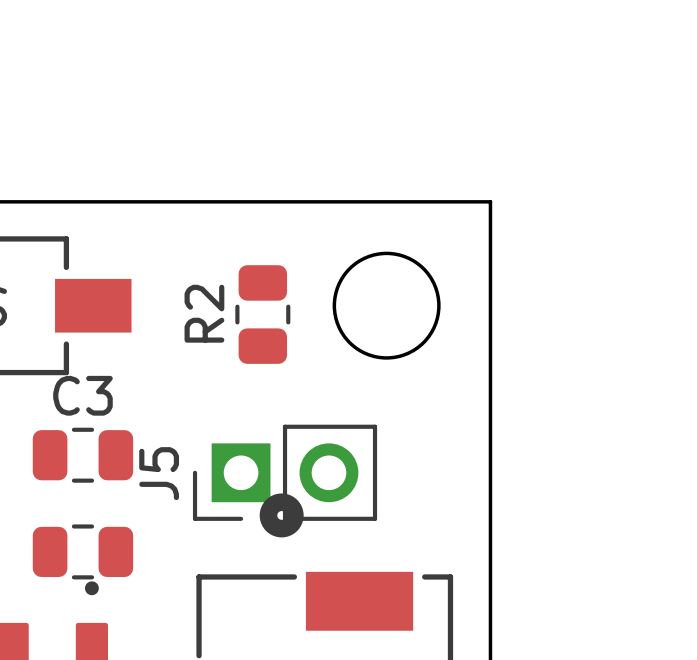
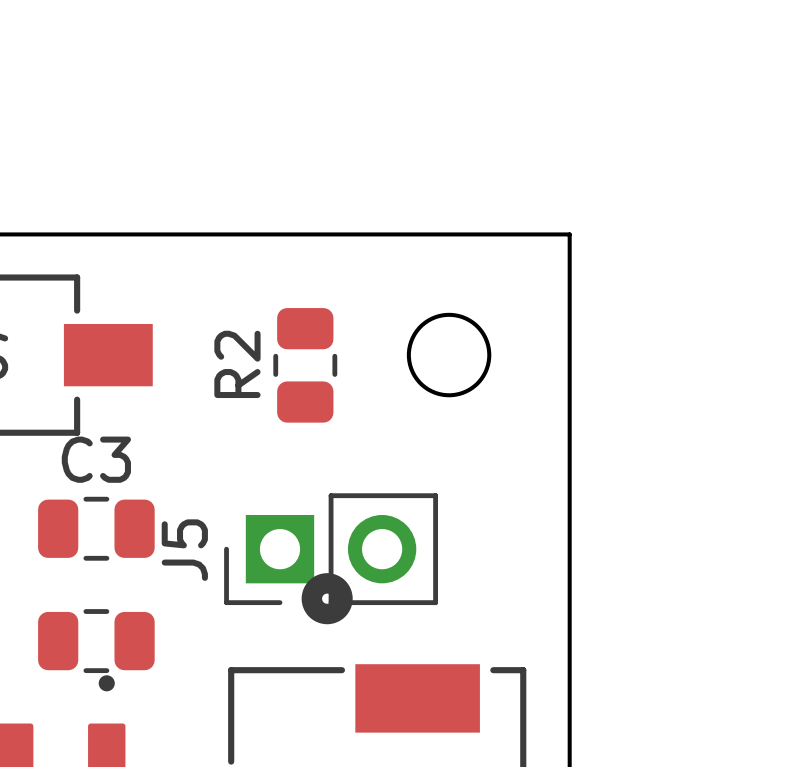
round board edge size: [332, 251, 441, 360] -> [406, 312, 492, 398]

